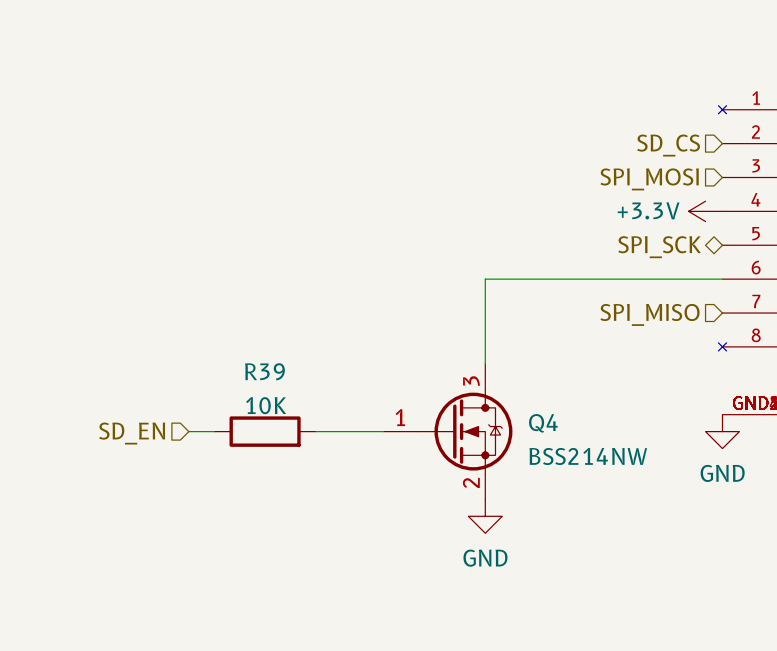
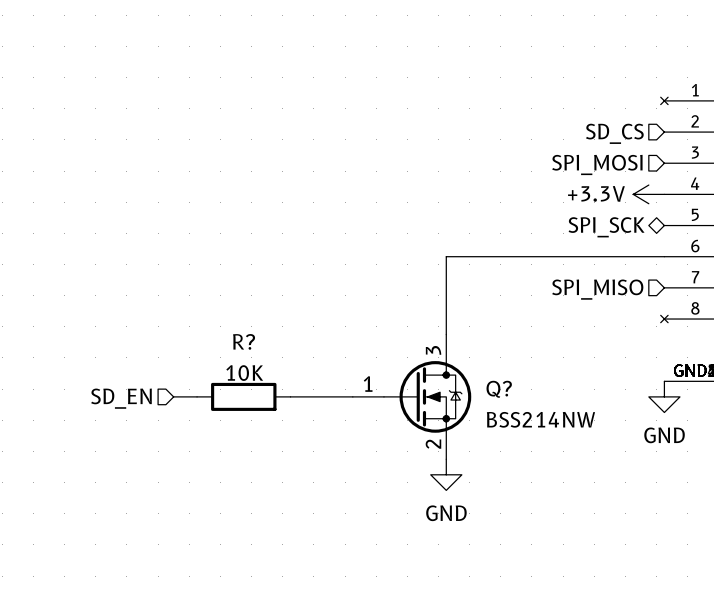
R39 name: R39 (264, 371) -> R? (244, 341)
Q4 name: Q4 (543, 423) -> Q? (499, 389)

